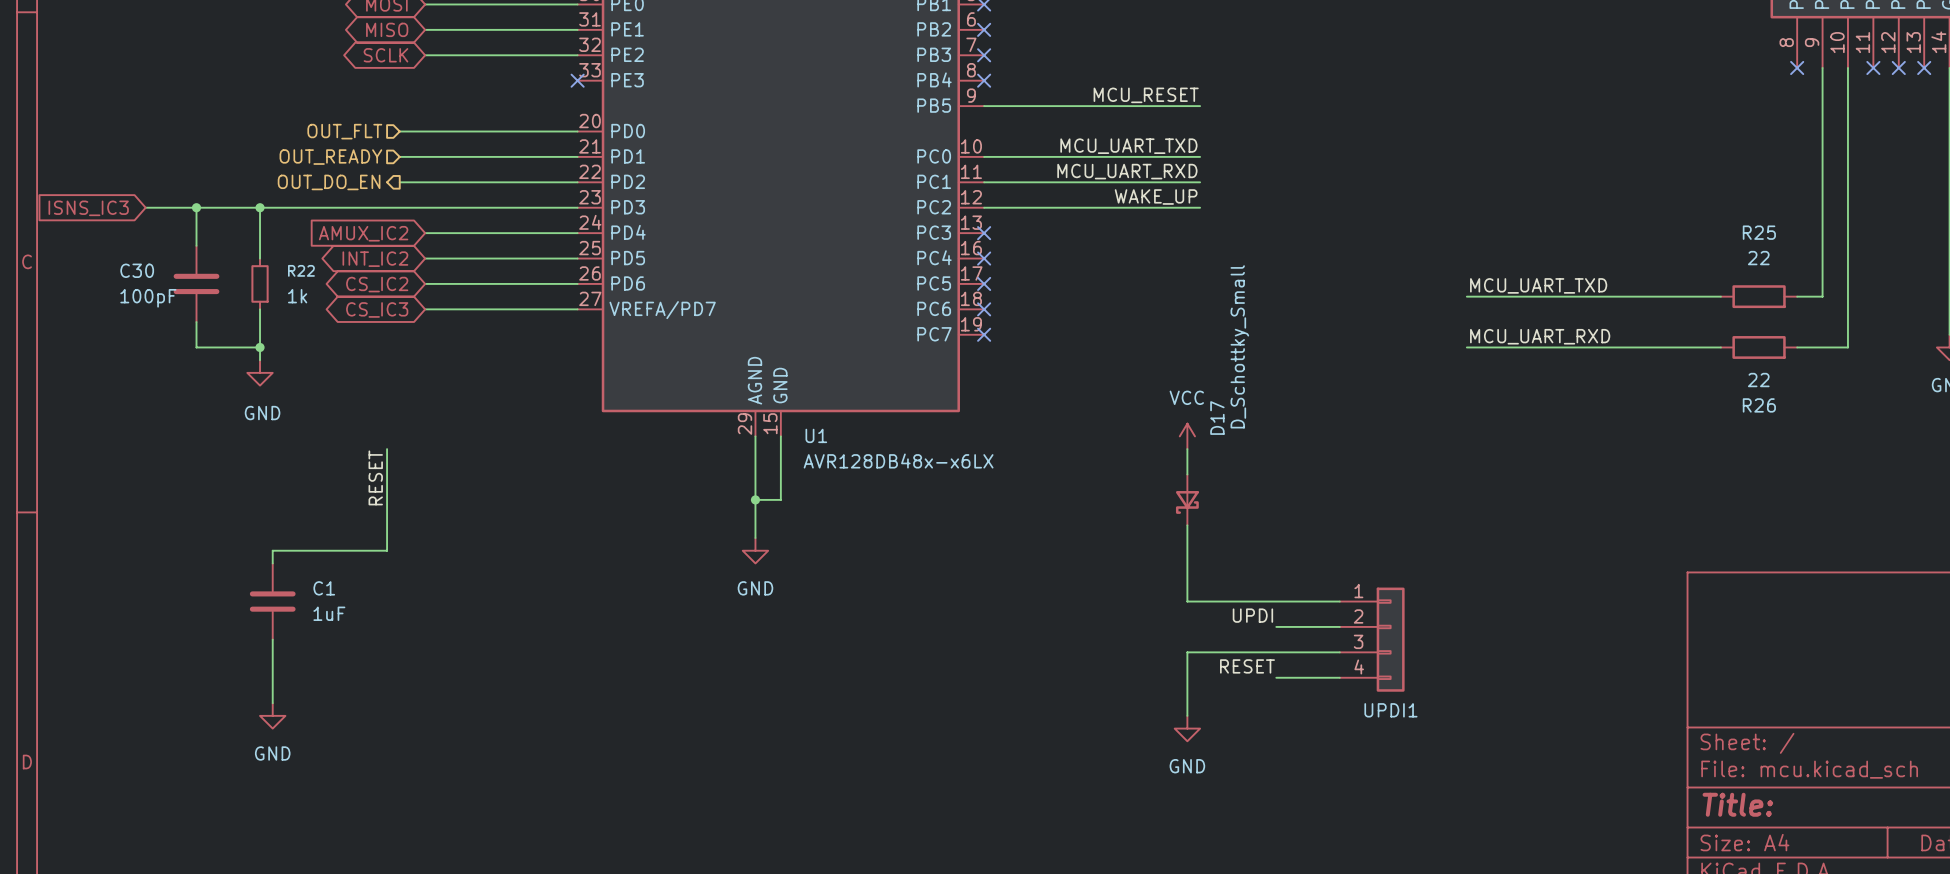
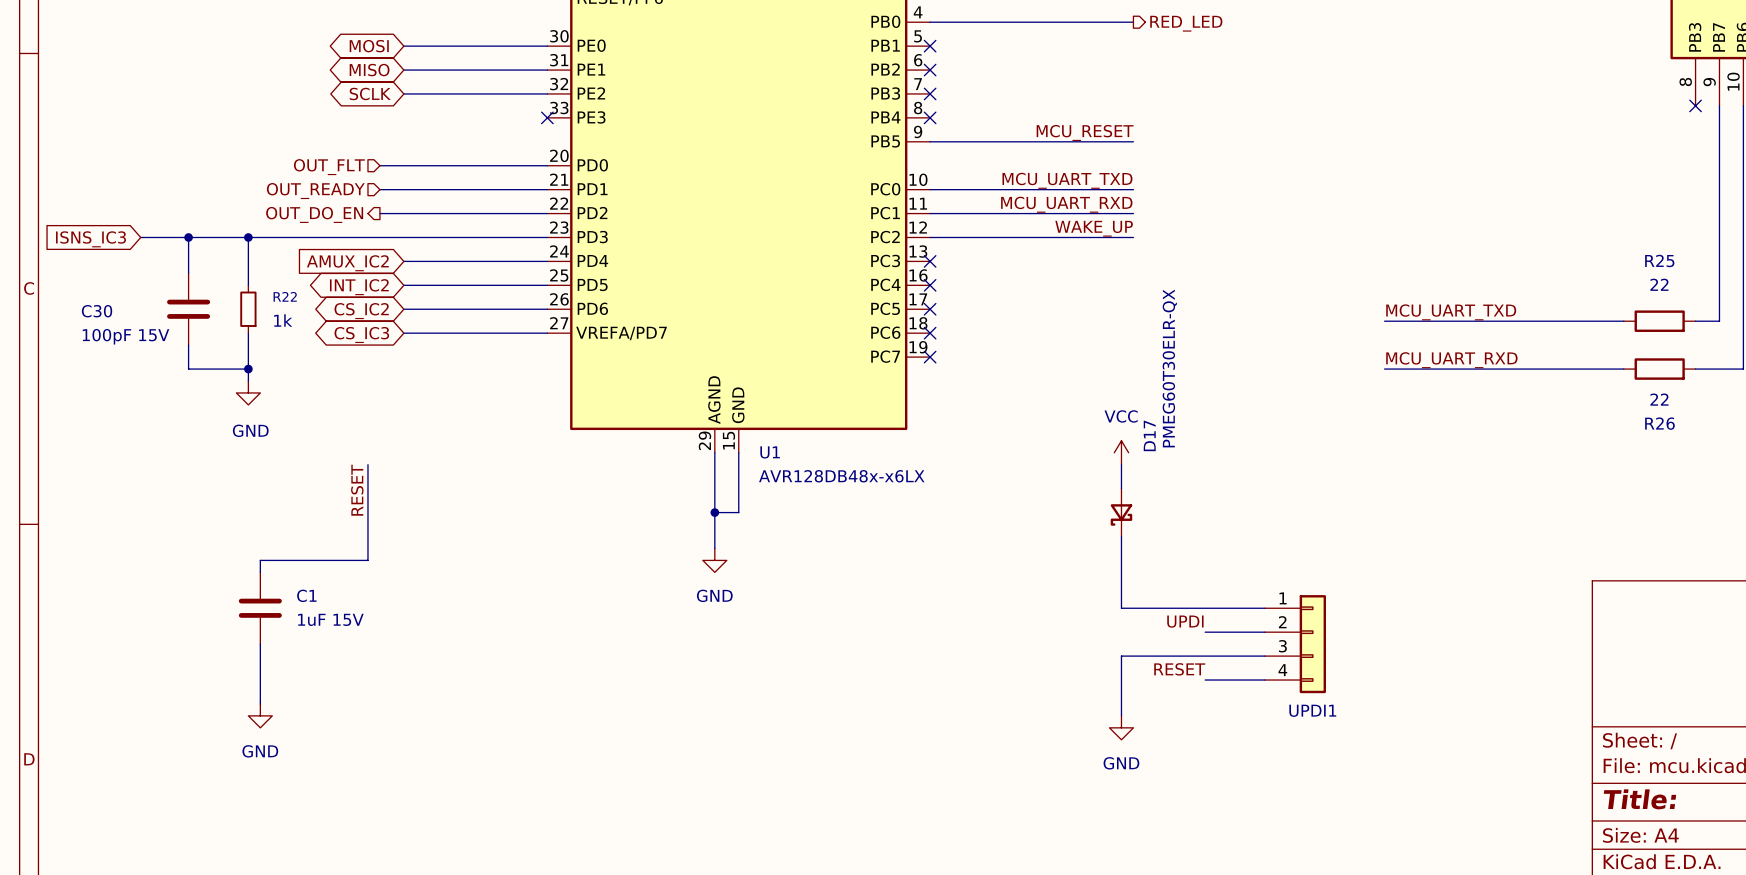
C30 name position: C30 (137, 270) -> C30 (97, 311)
C30 value: 100pF (148, 298) -> 100pF 15V (126, 336)
D17 value: D_Schottky_Small (1239, 346) -> PMEG60T30ELR-QX (1169, 368)
C1 value: 1uF (329, 613) -> 1uF 15V (330, 619)

